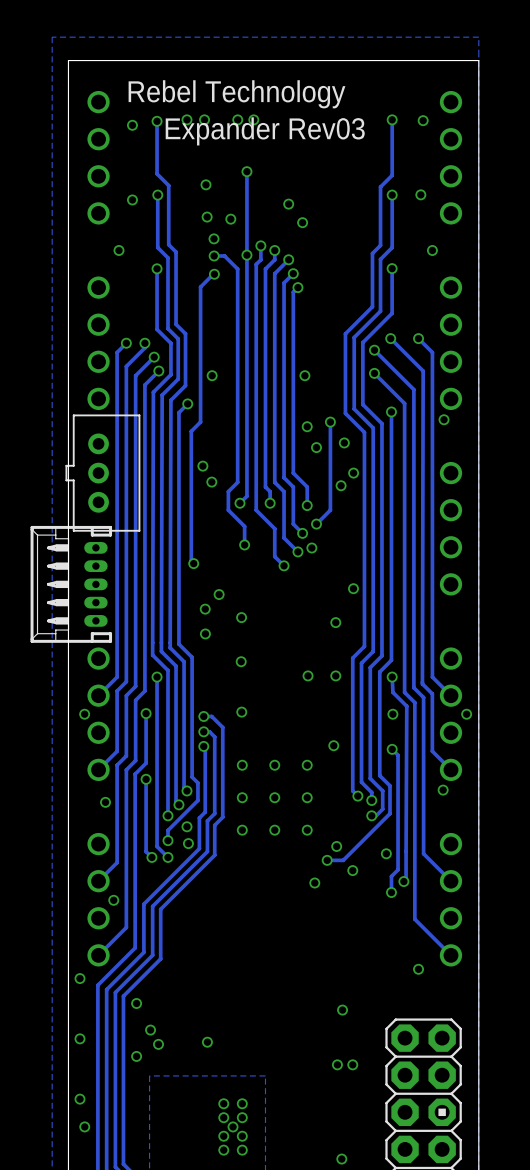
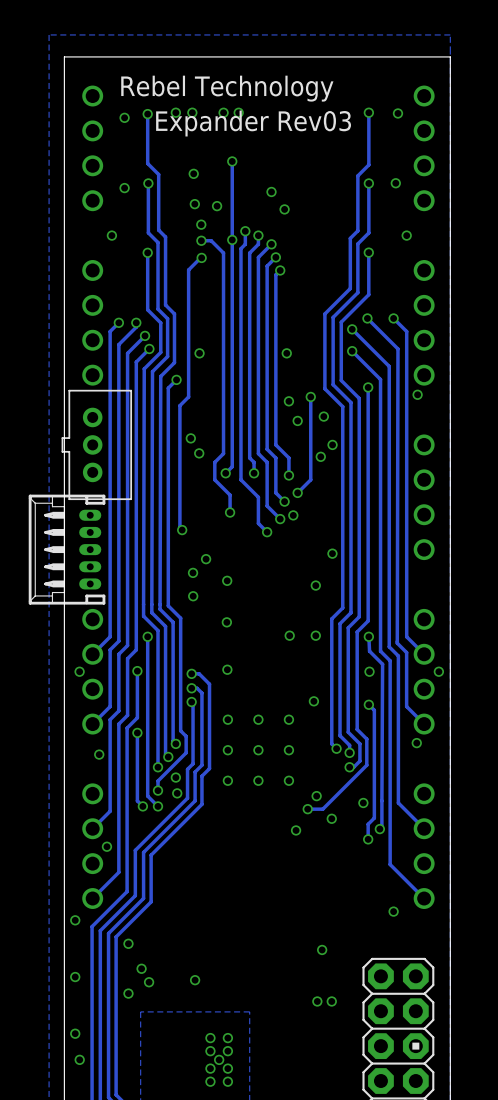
via: (341, 1159) -> none

